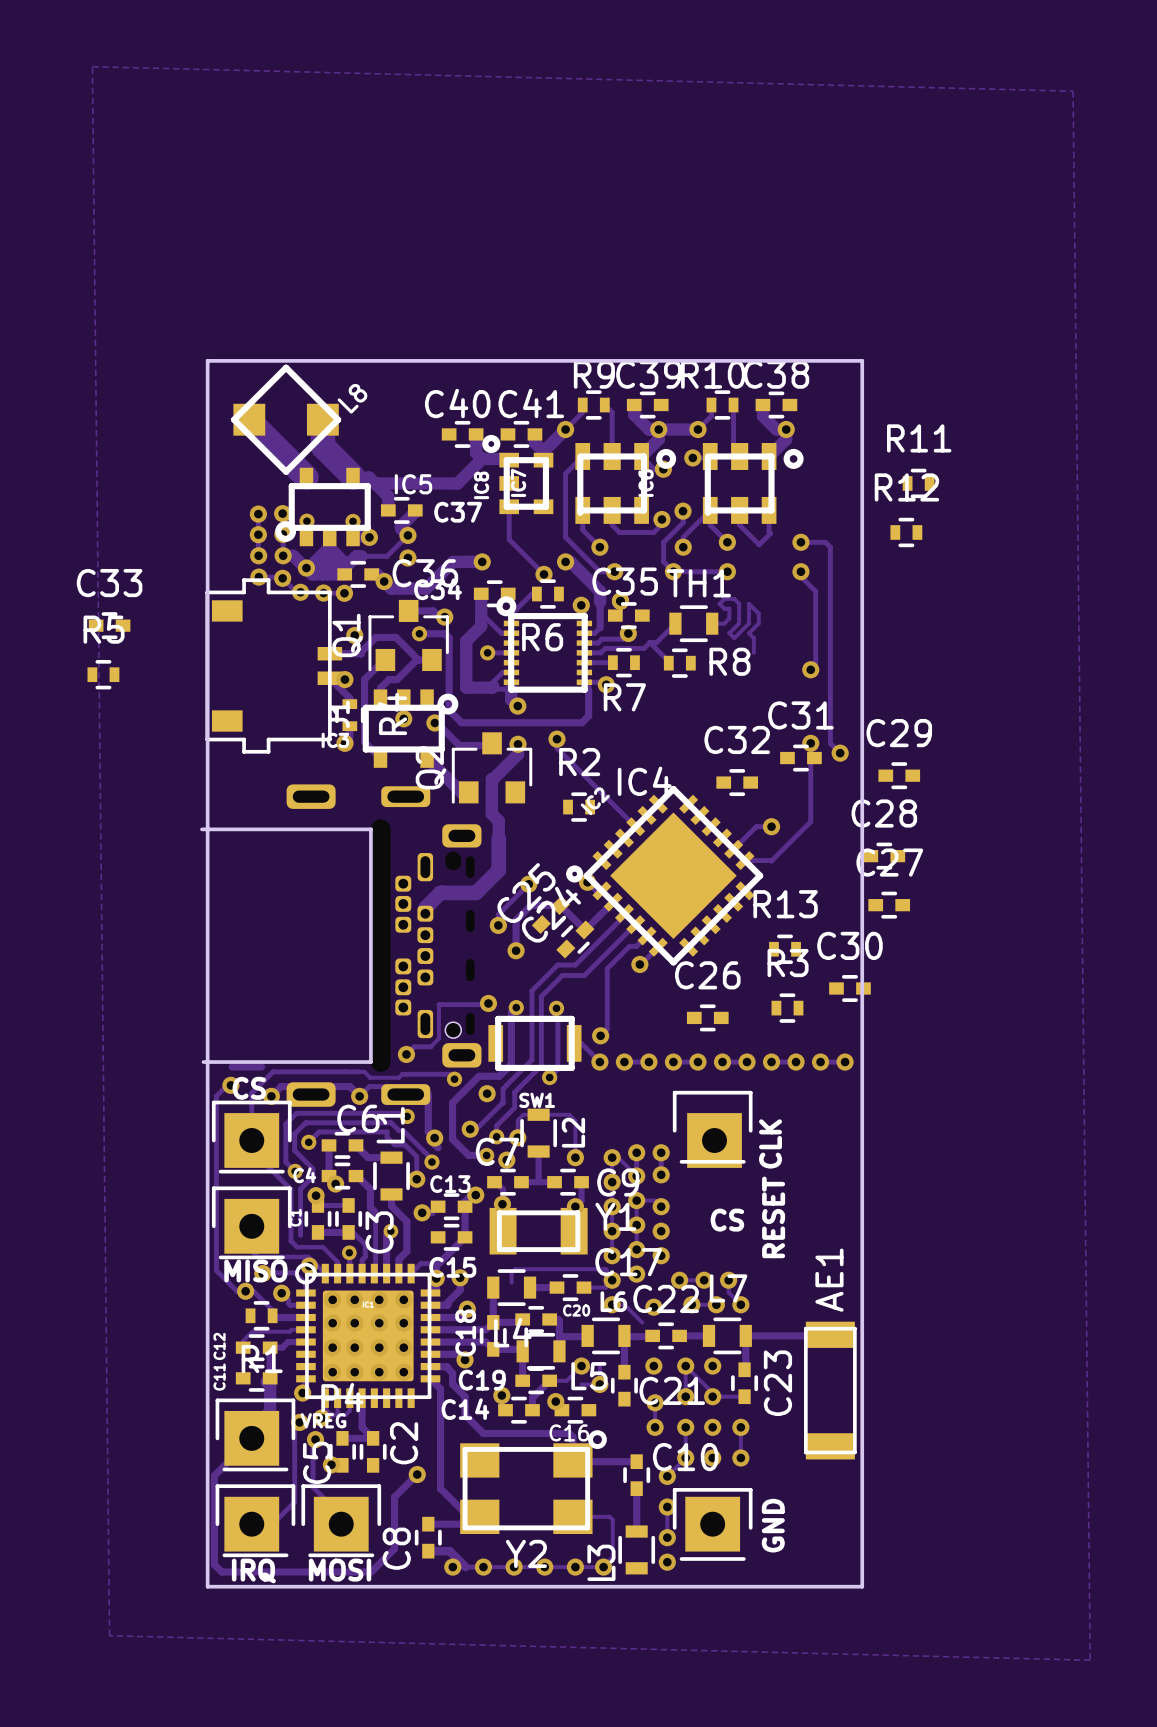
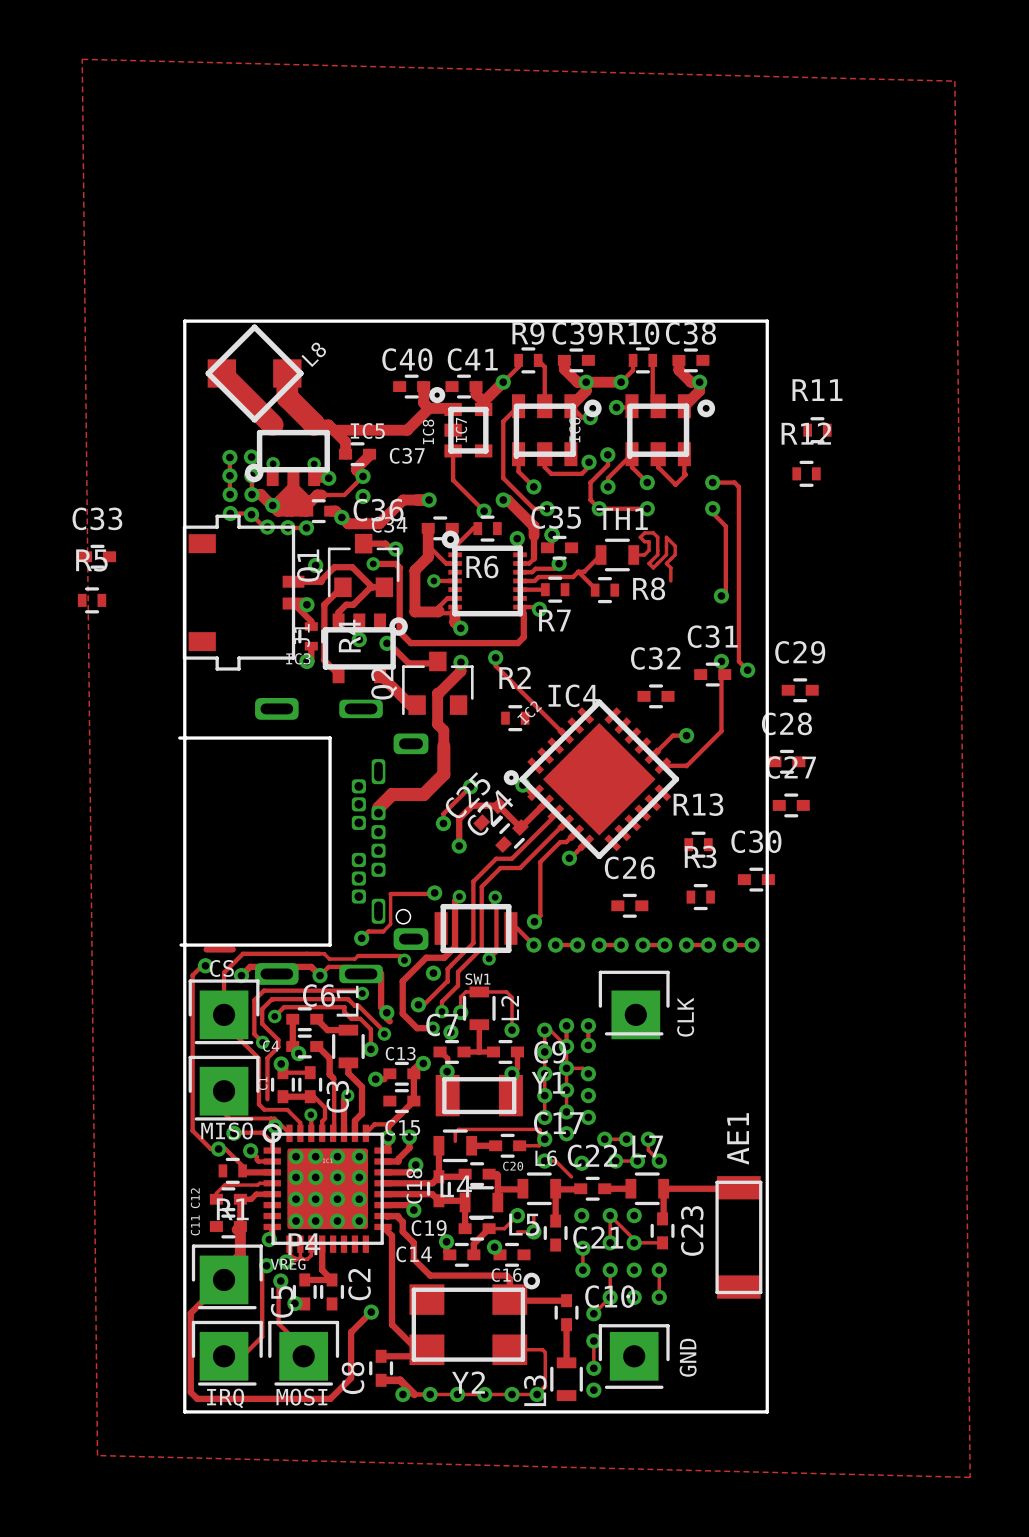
text: RESET (773, 1217) -> none
text: CS (727, 1220) -> none

